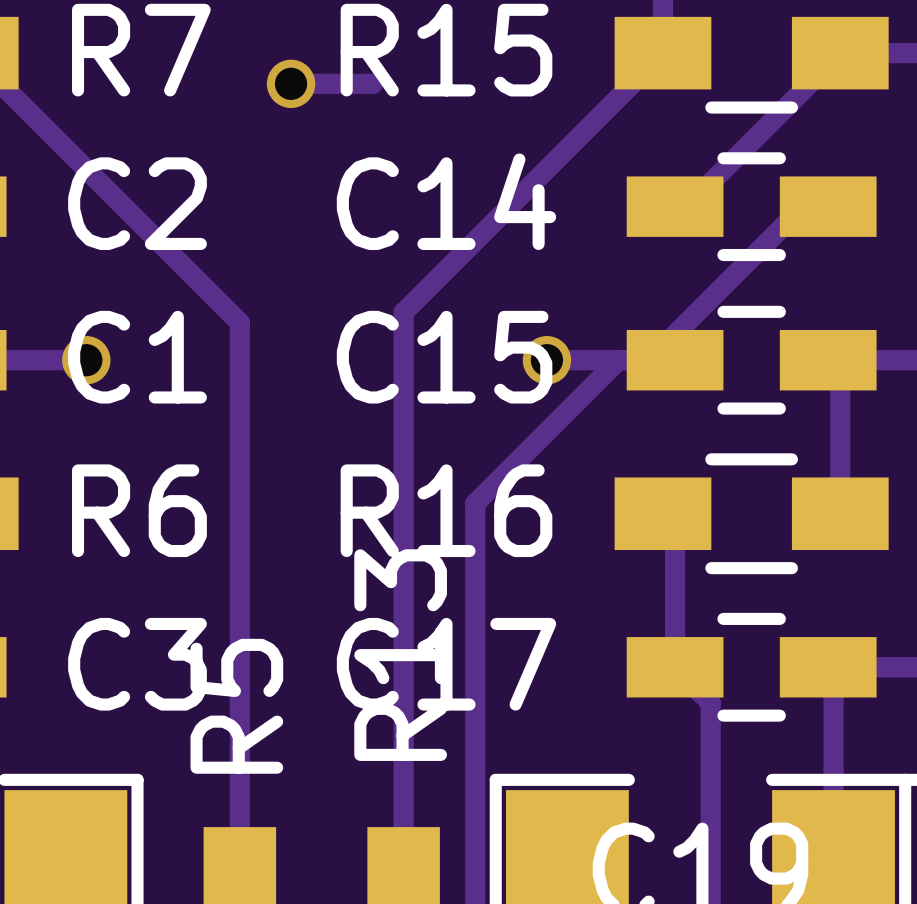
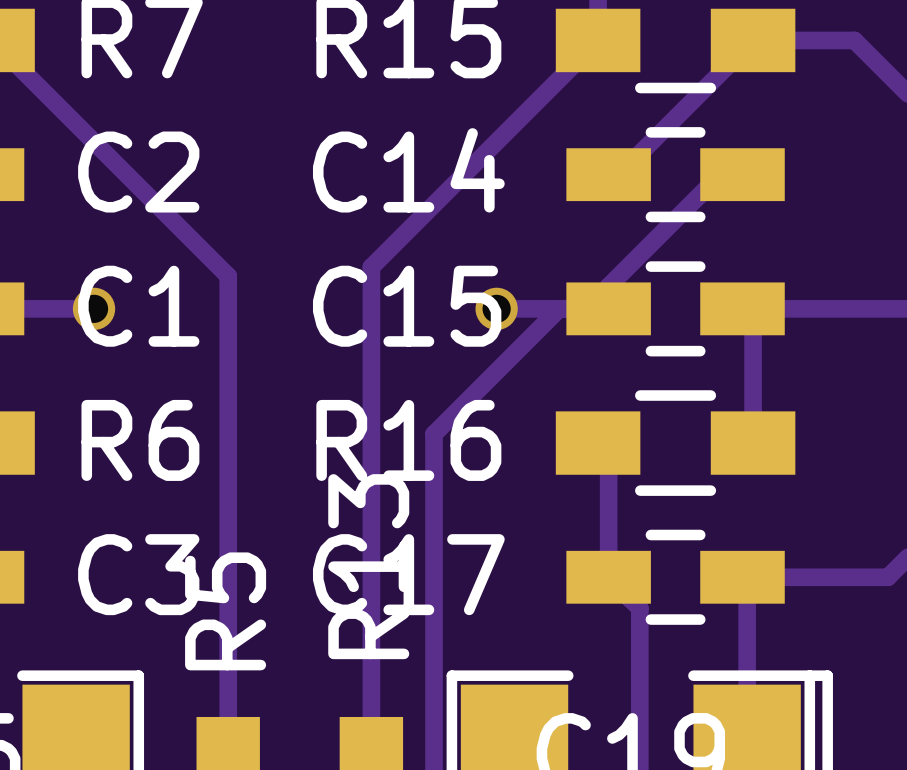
track: (291, 83) (372, 83) -> none
via: (291, 83) -> none

